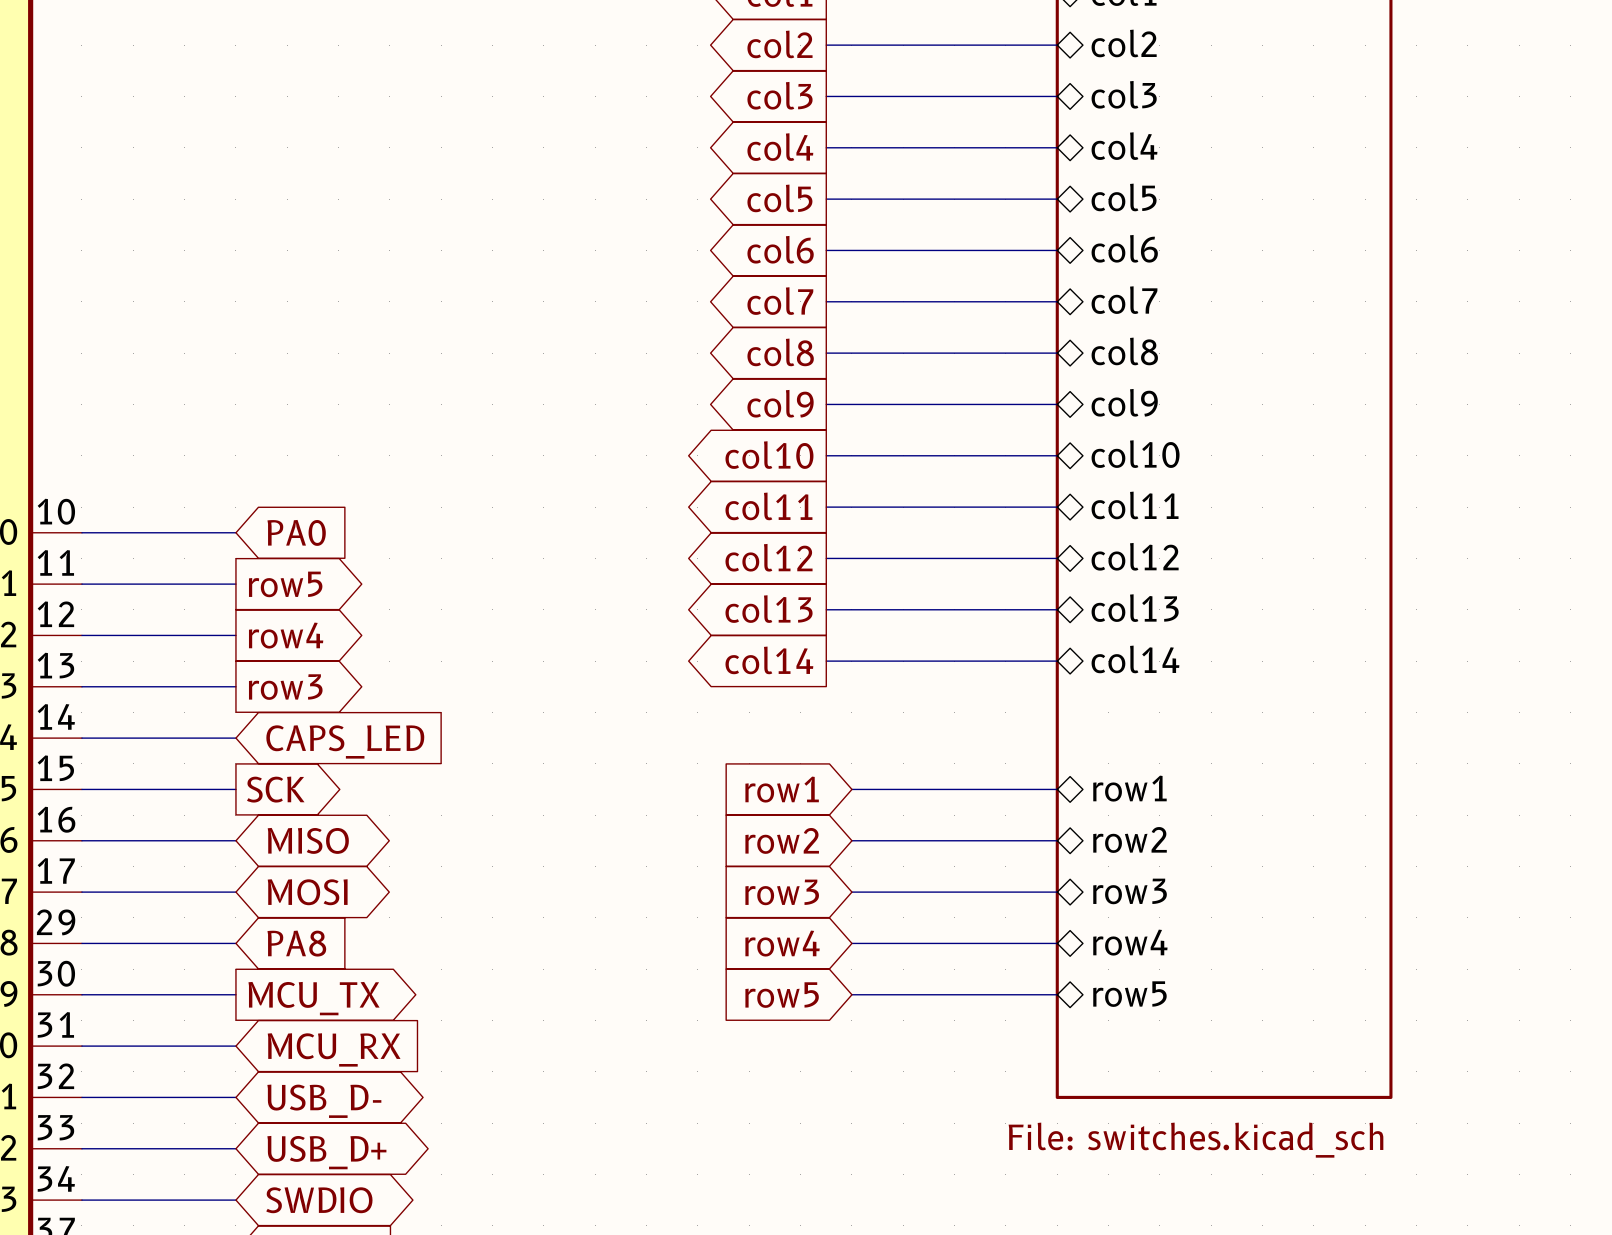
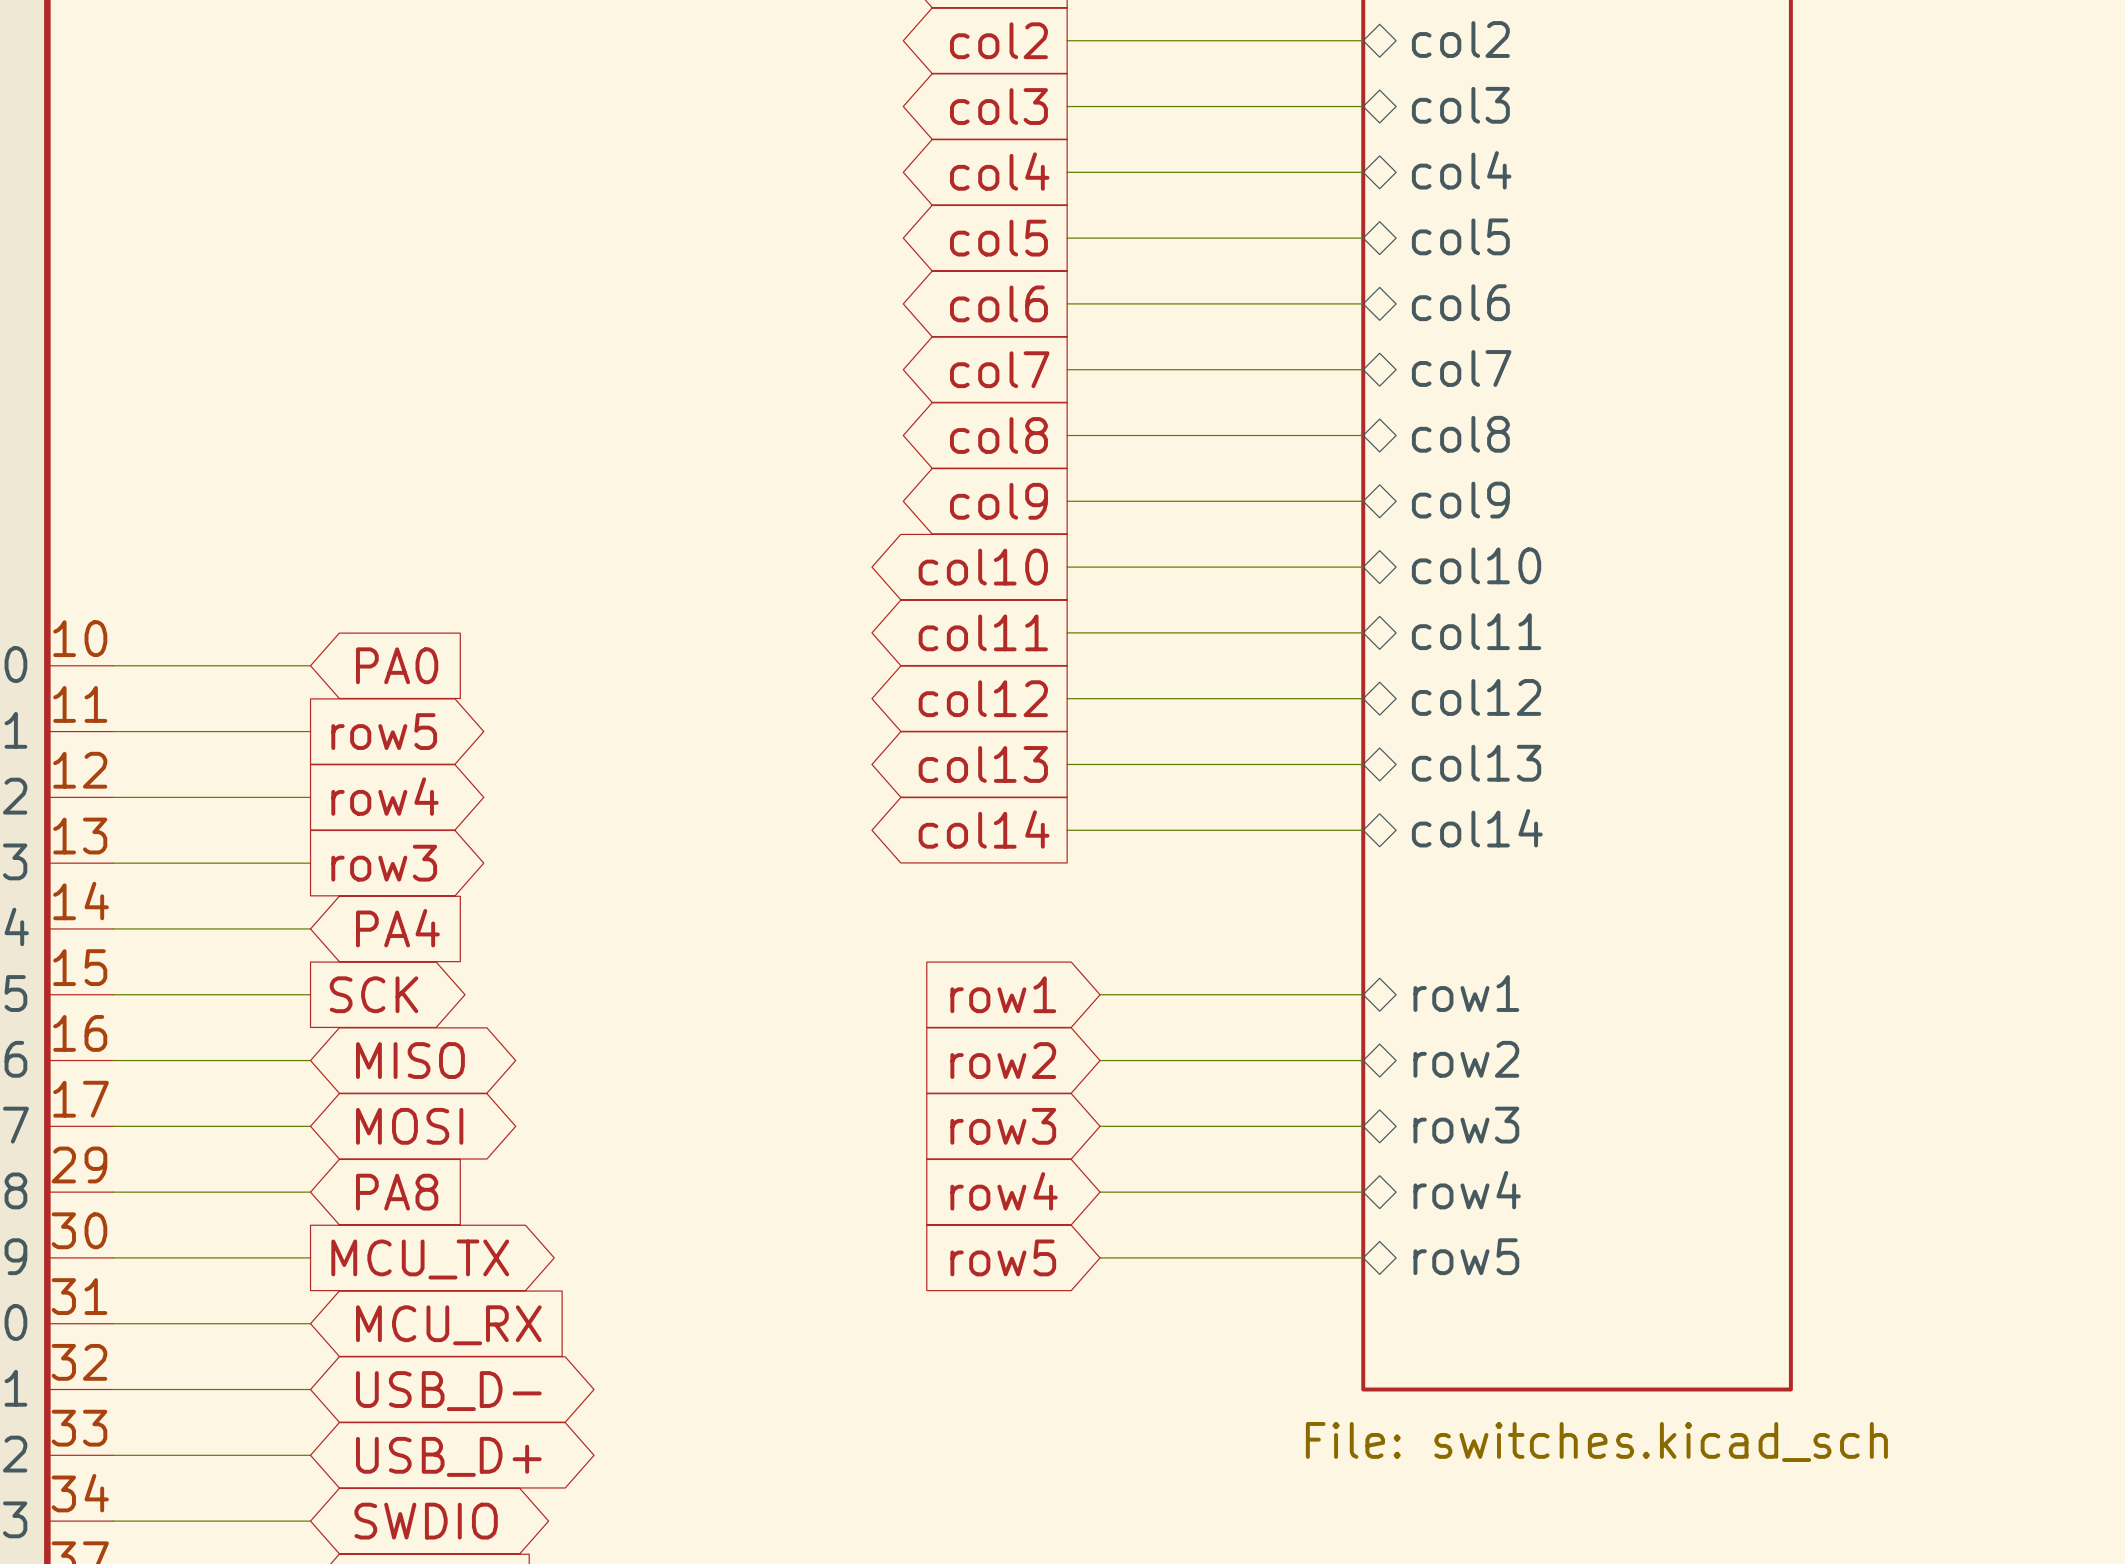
global label: CAPS_LED (345, 741) -> PA4 (397, 928)

